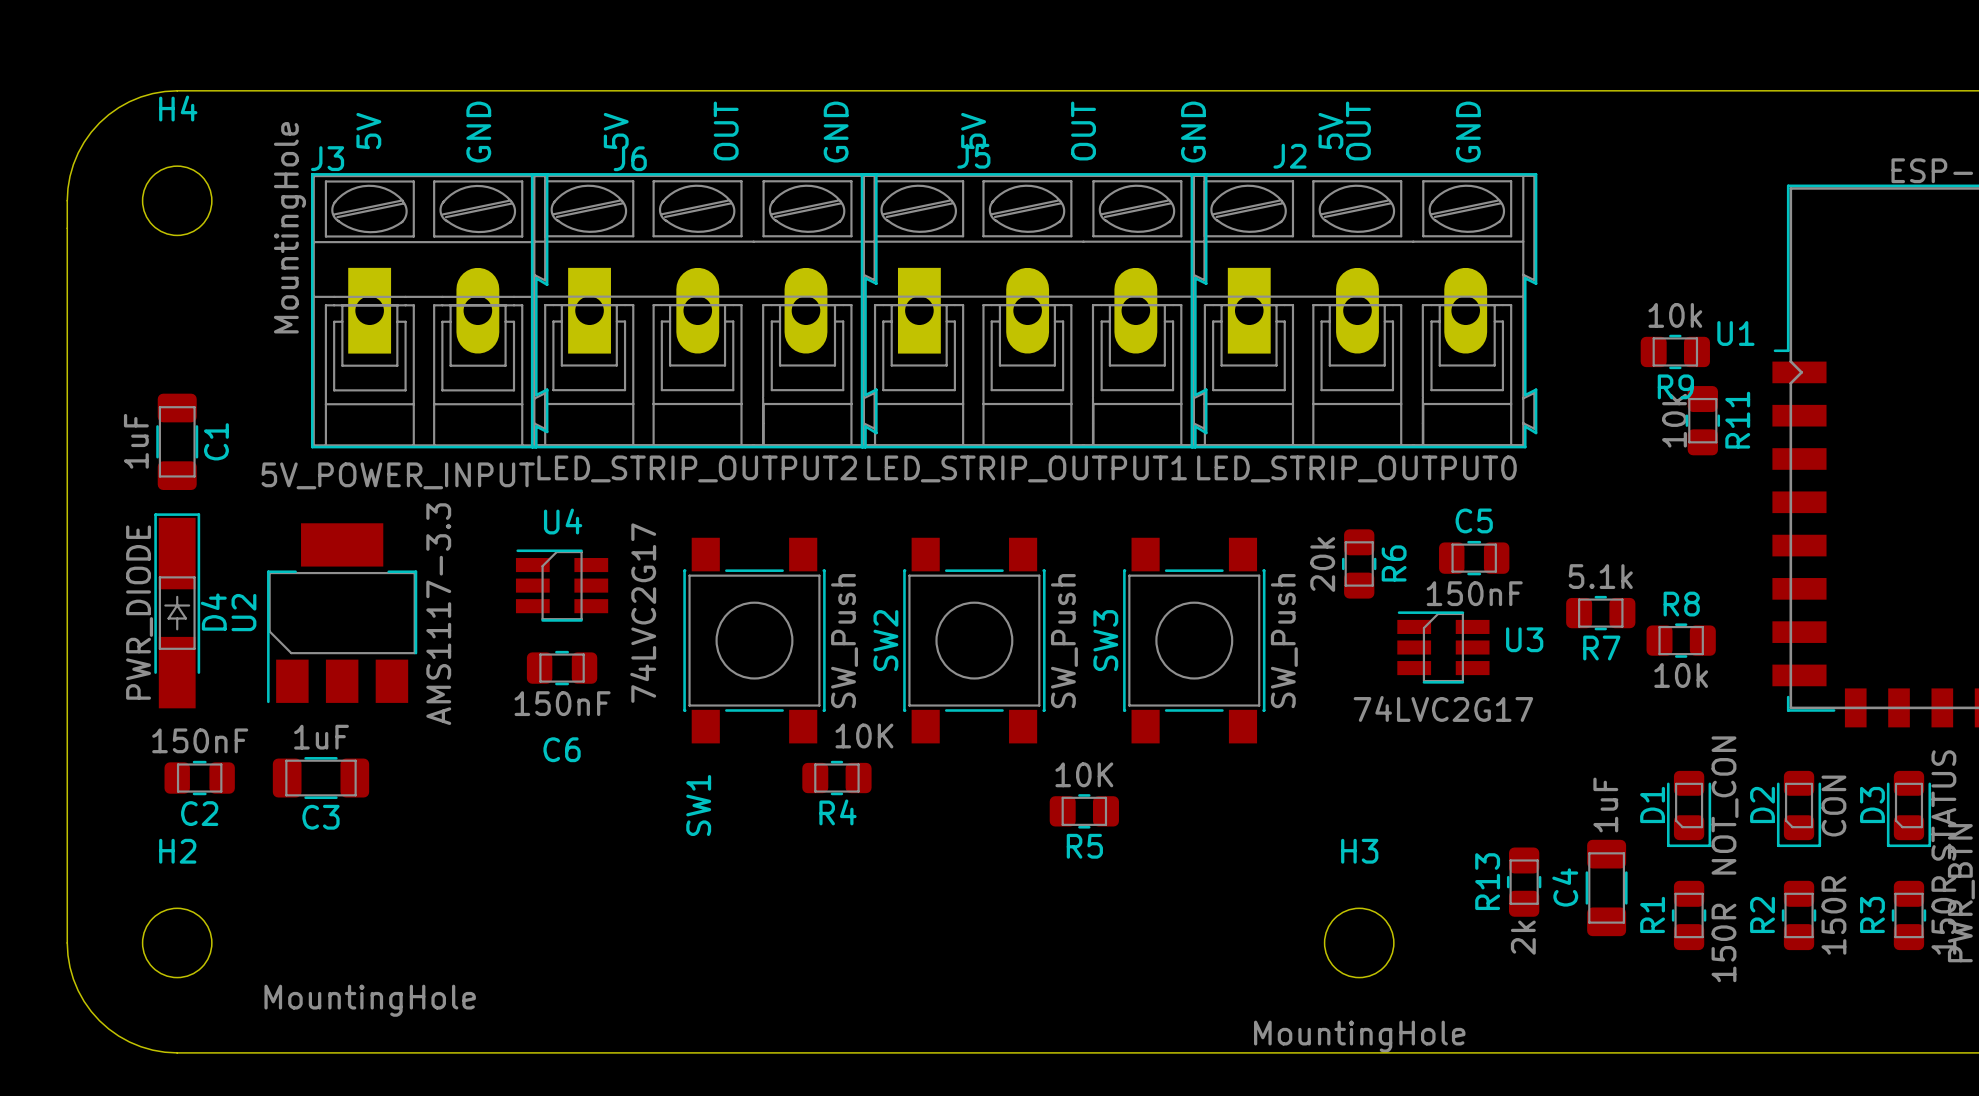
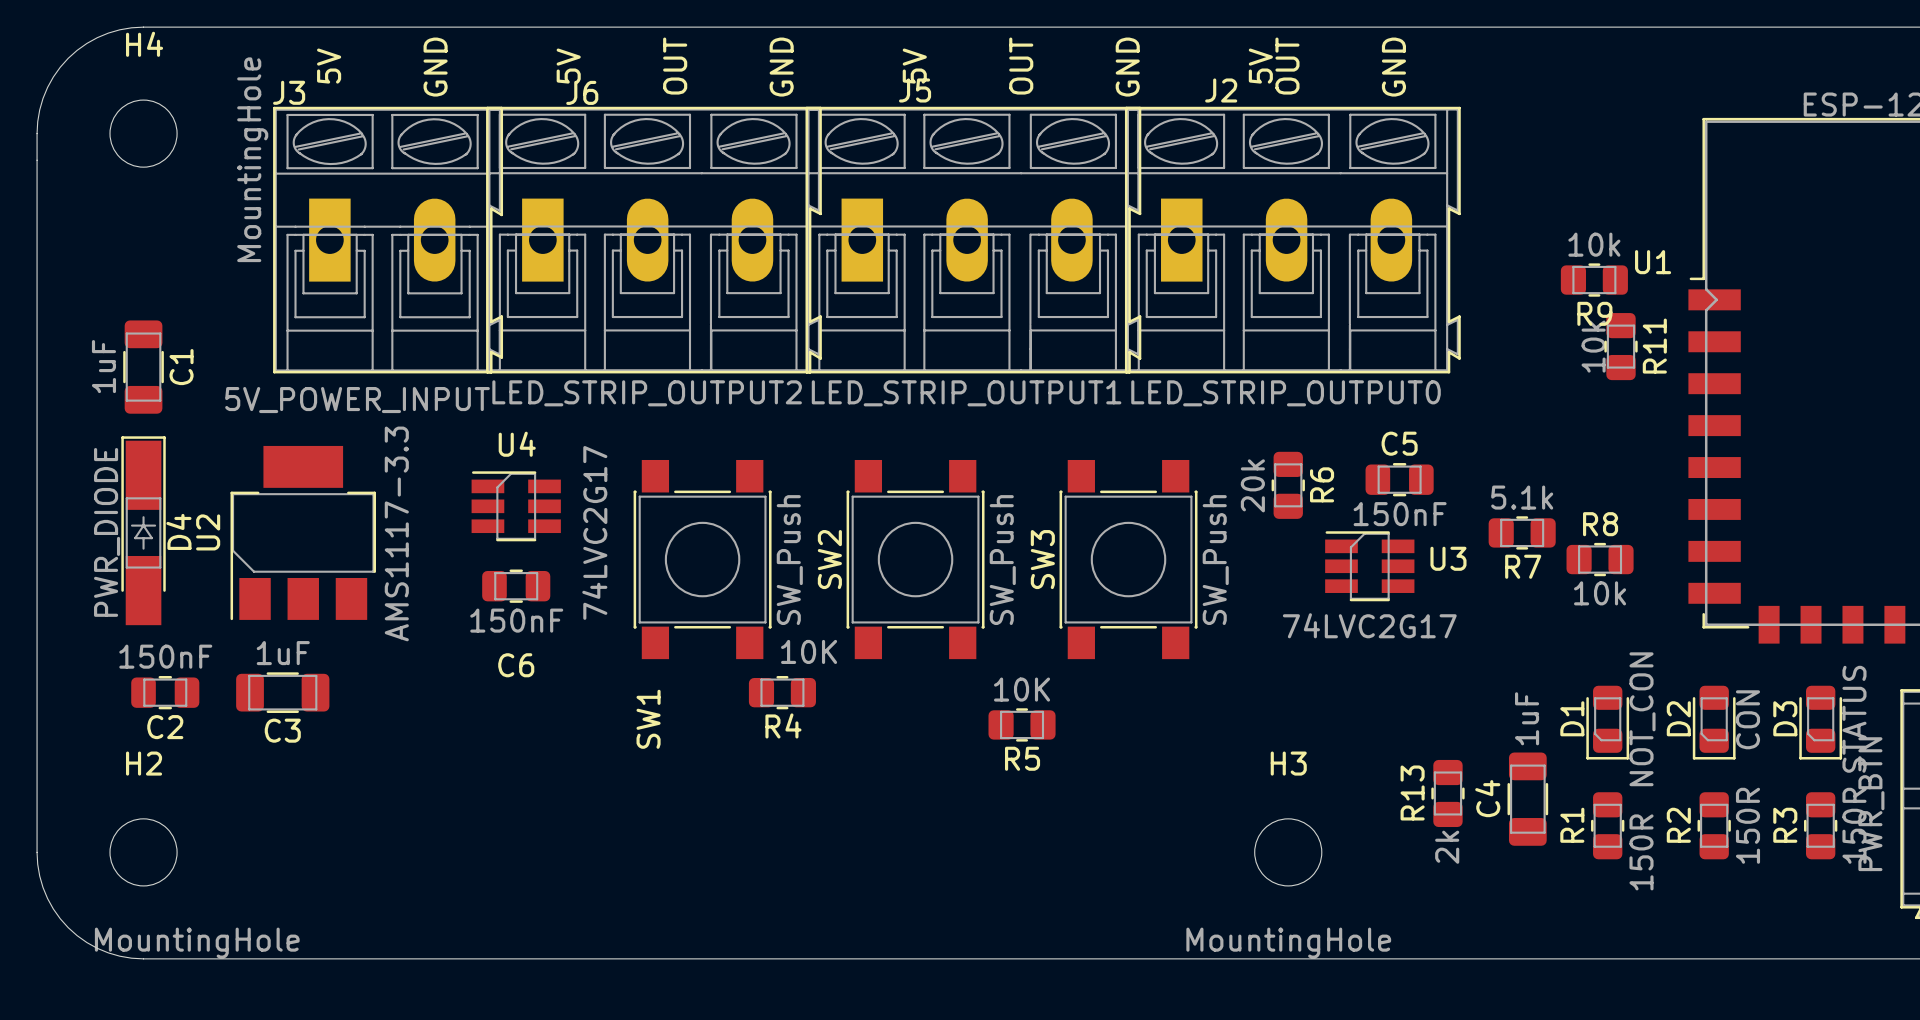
H2 value position: MountingHole (370, 1000) -> MountingHole (197, 943)

